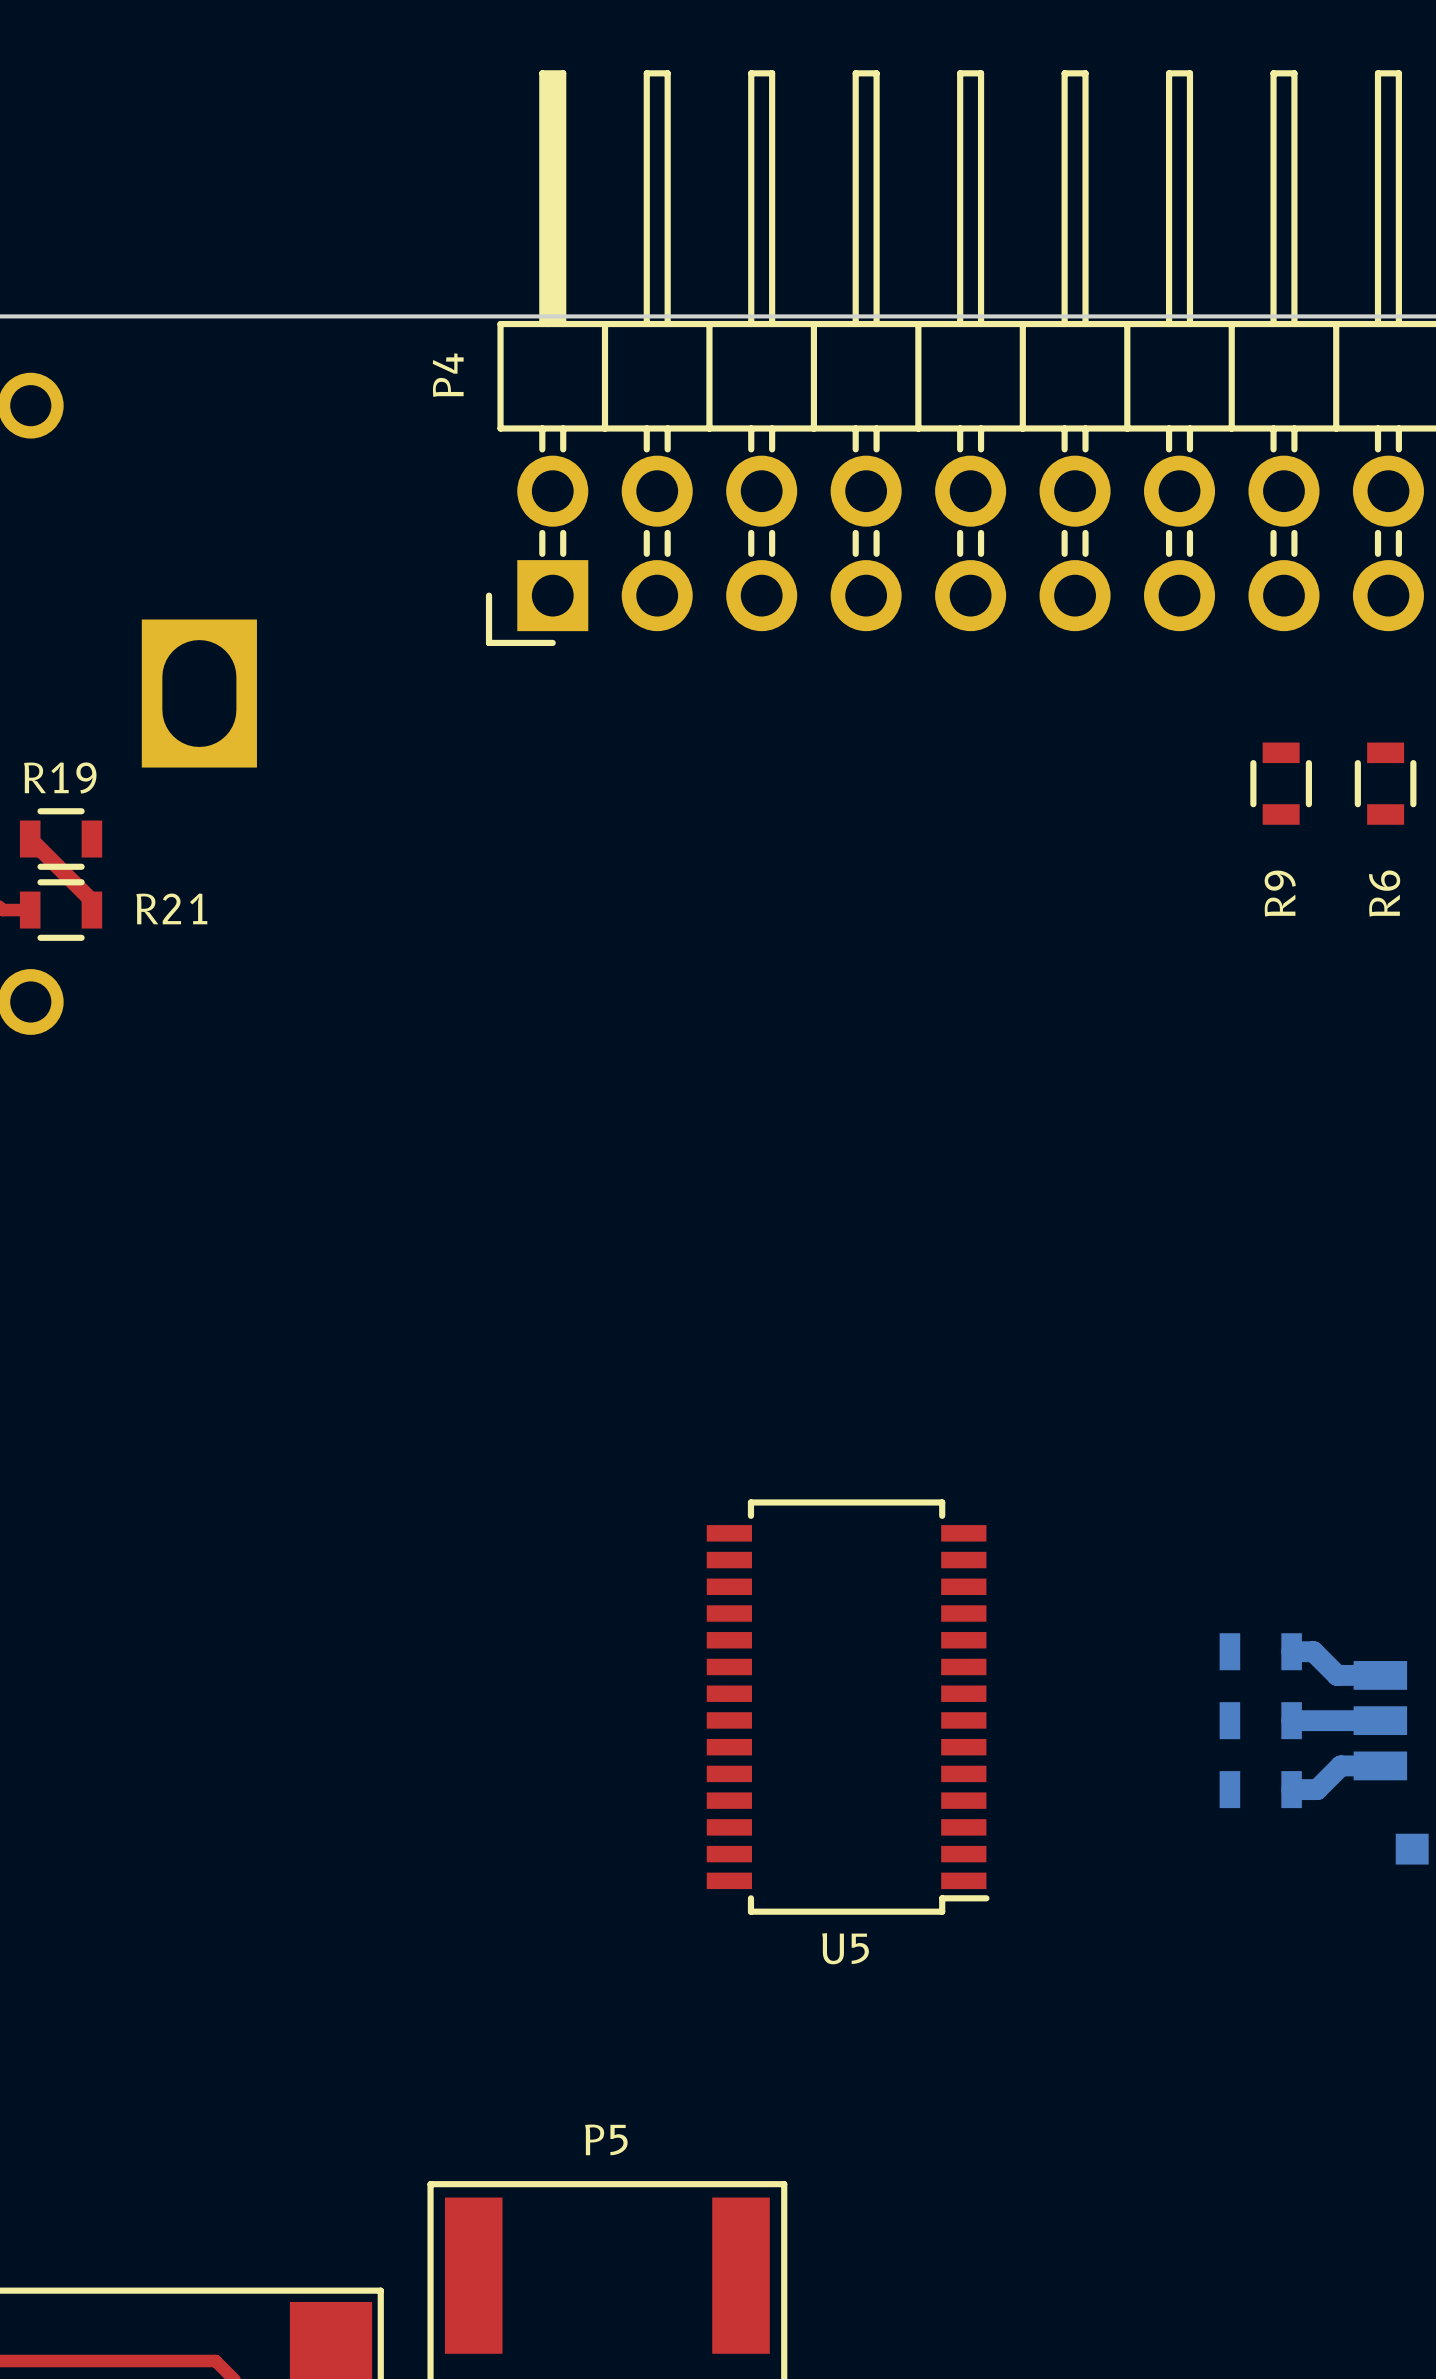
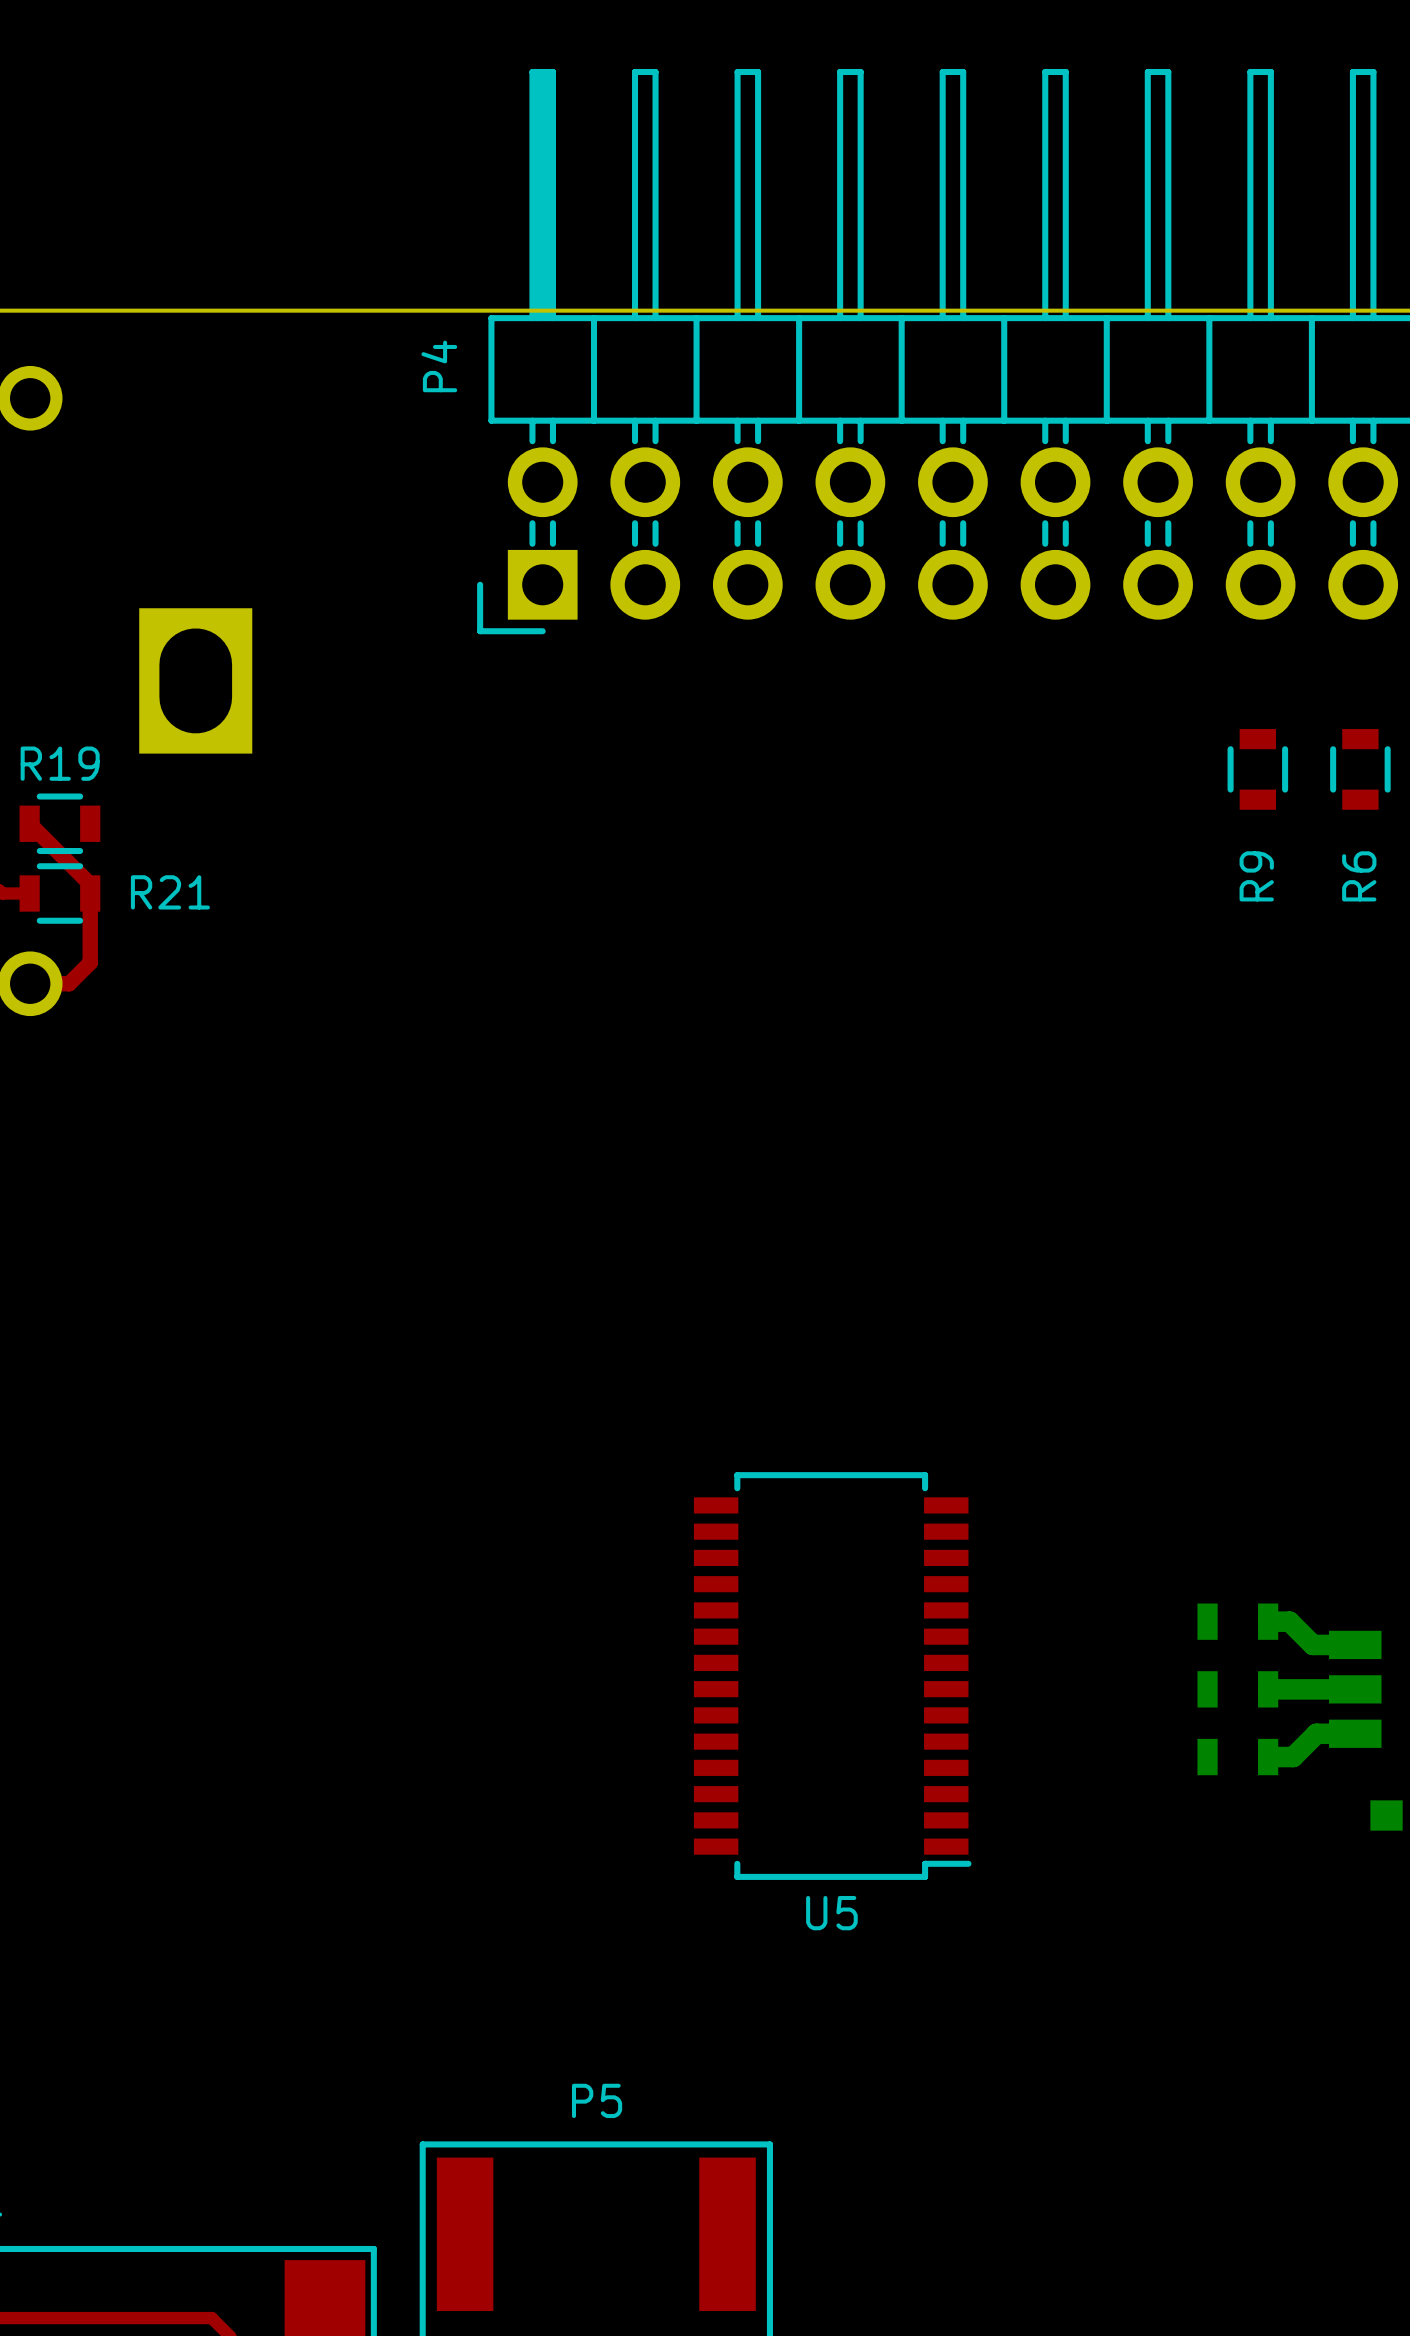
top track: none -> (90, 893) (90, 962) (69, 983) (30, 983)

